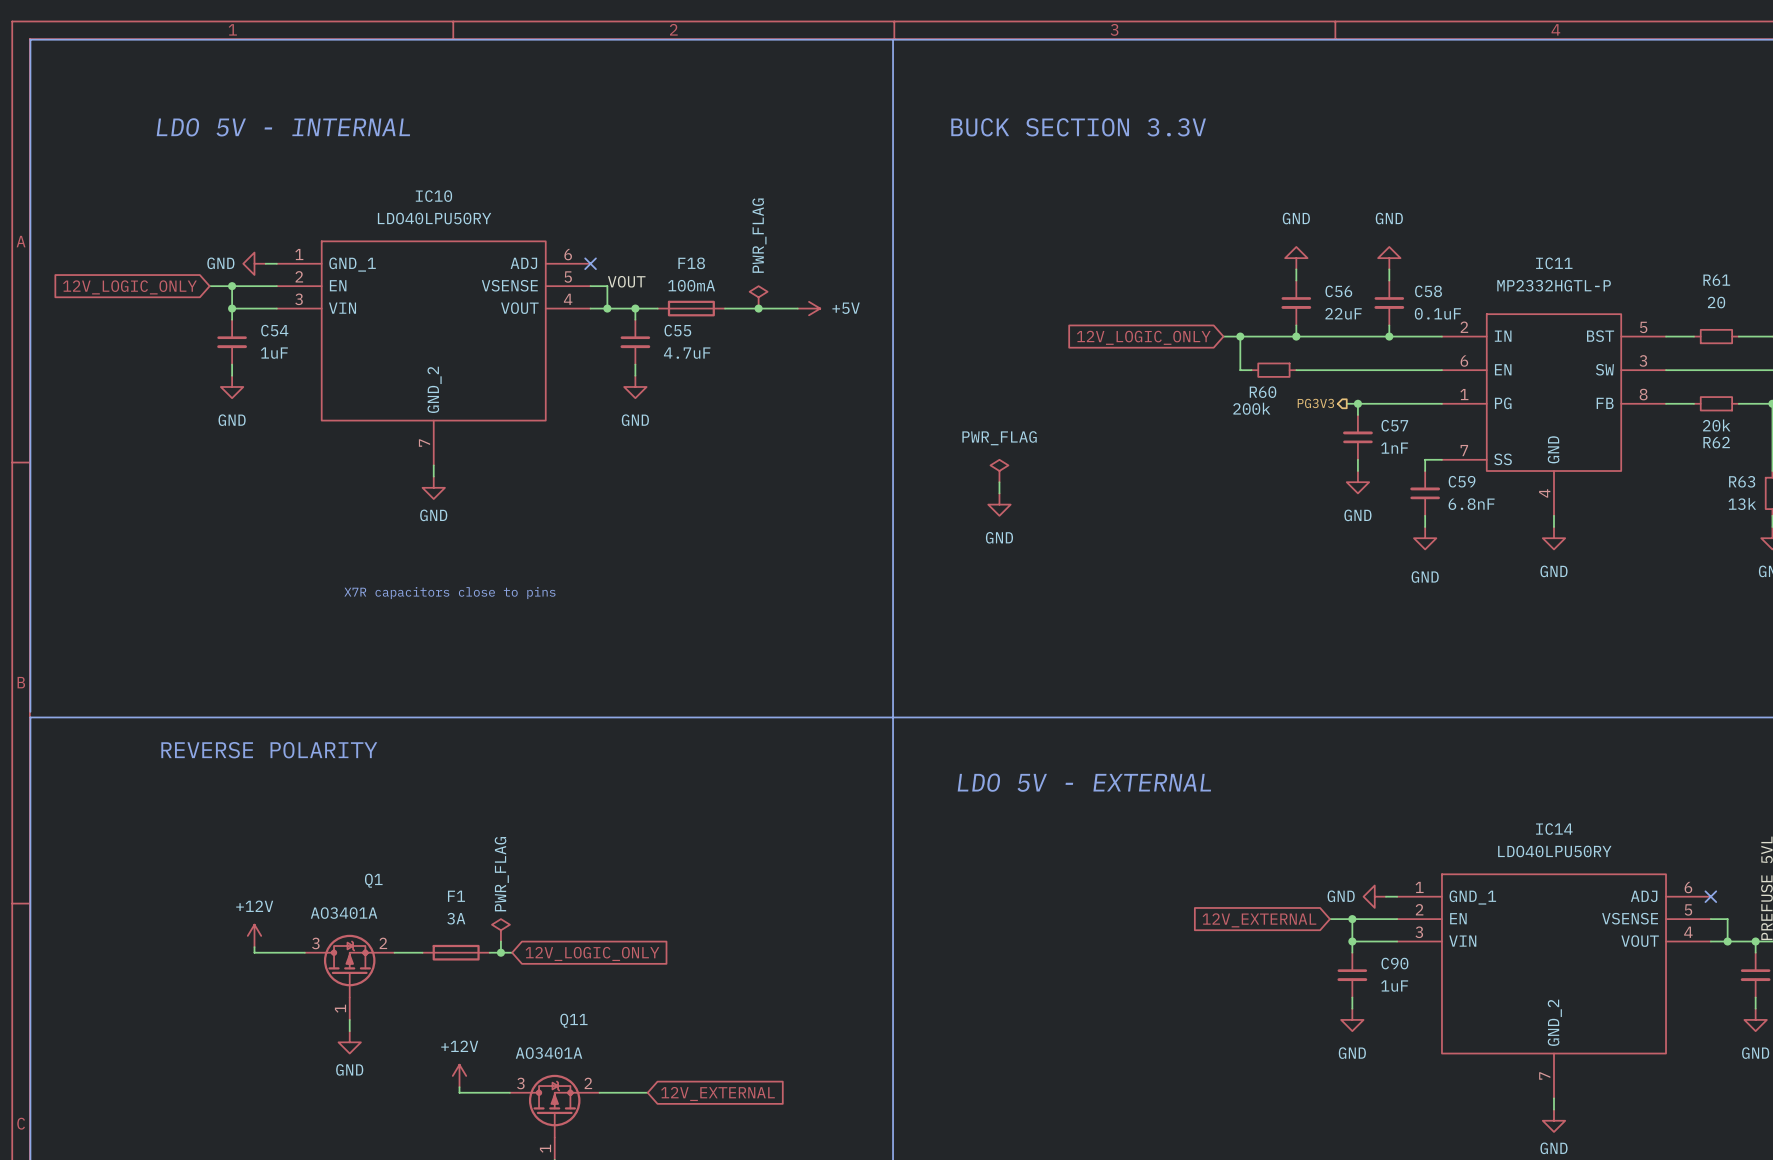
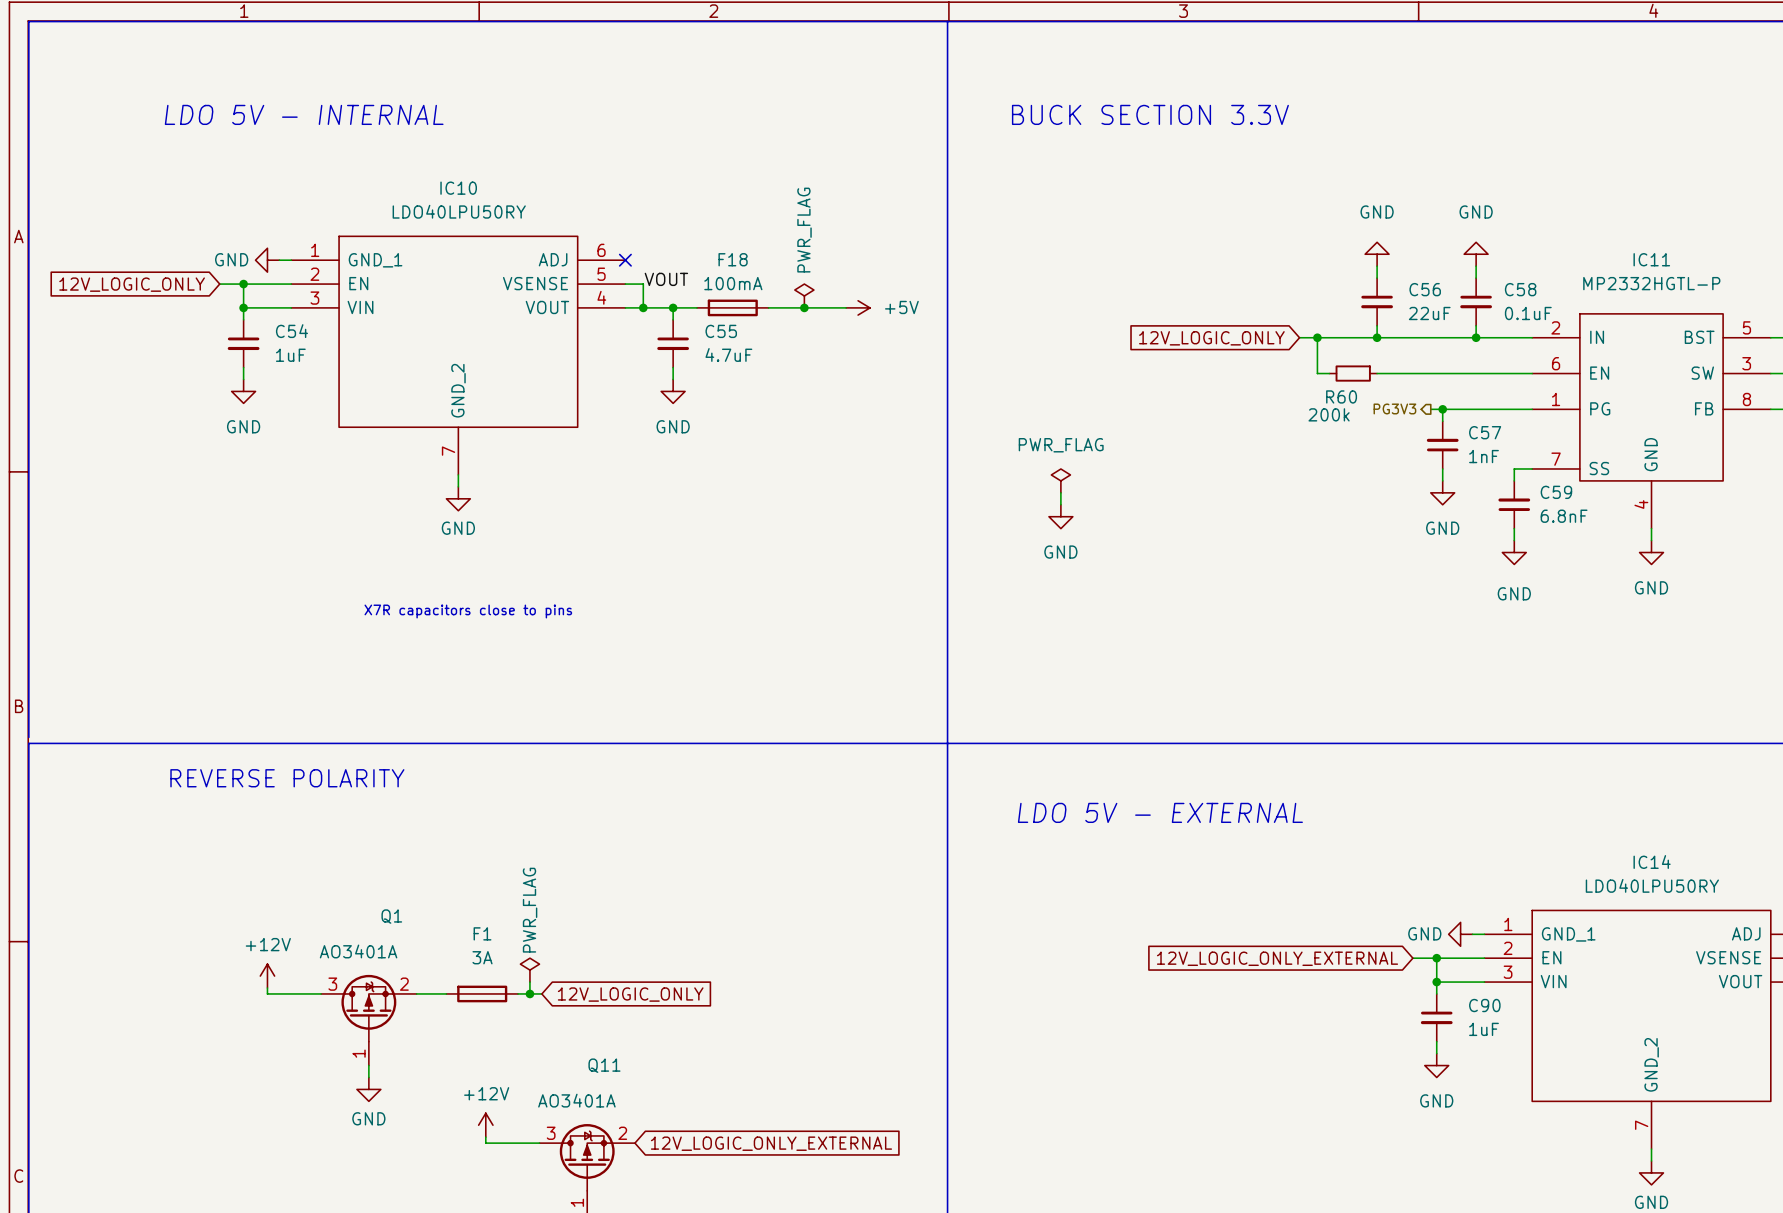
global label: 12V_EXTERNAL (1259, 920) -> 12V_LOGIC_ONLY_EXTERNAL (1277, 958)
wire: (599, 1092) (647, 1092) -> none
global label: 12V_EXTERNAL (717, 1094) -> 12V_LOGIC_ONLY_EXTERNAL (771, 1143)

